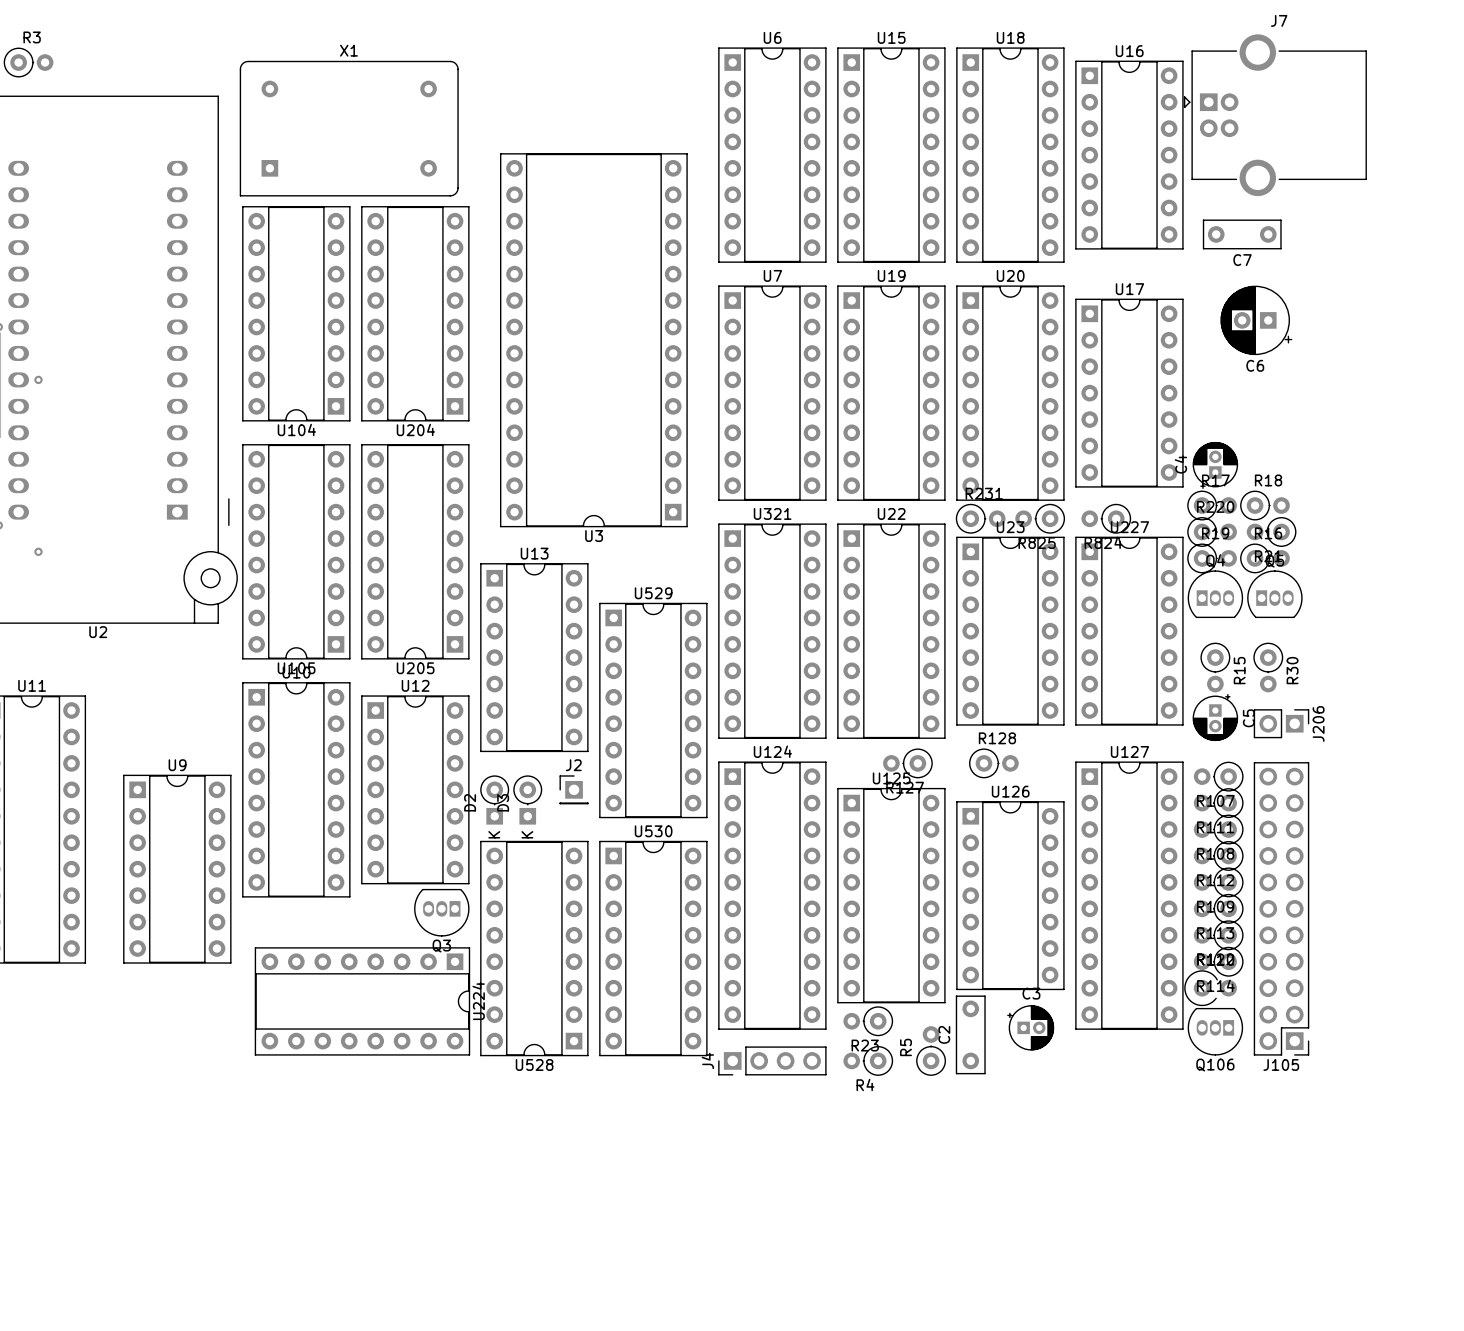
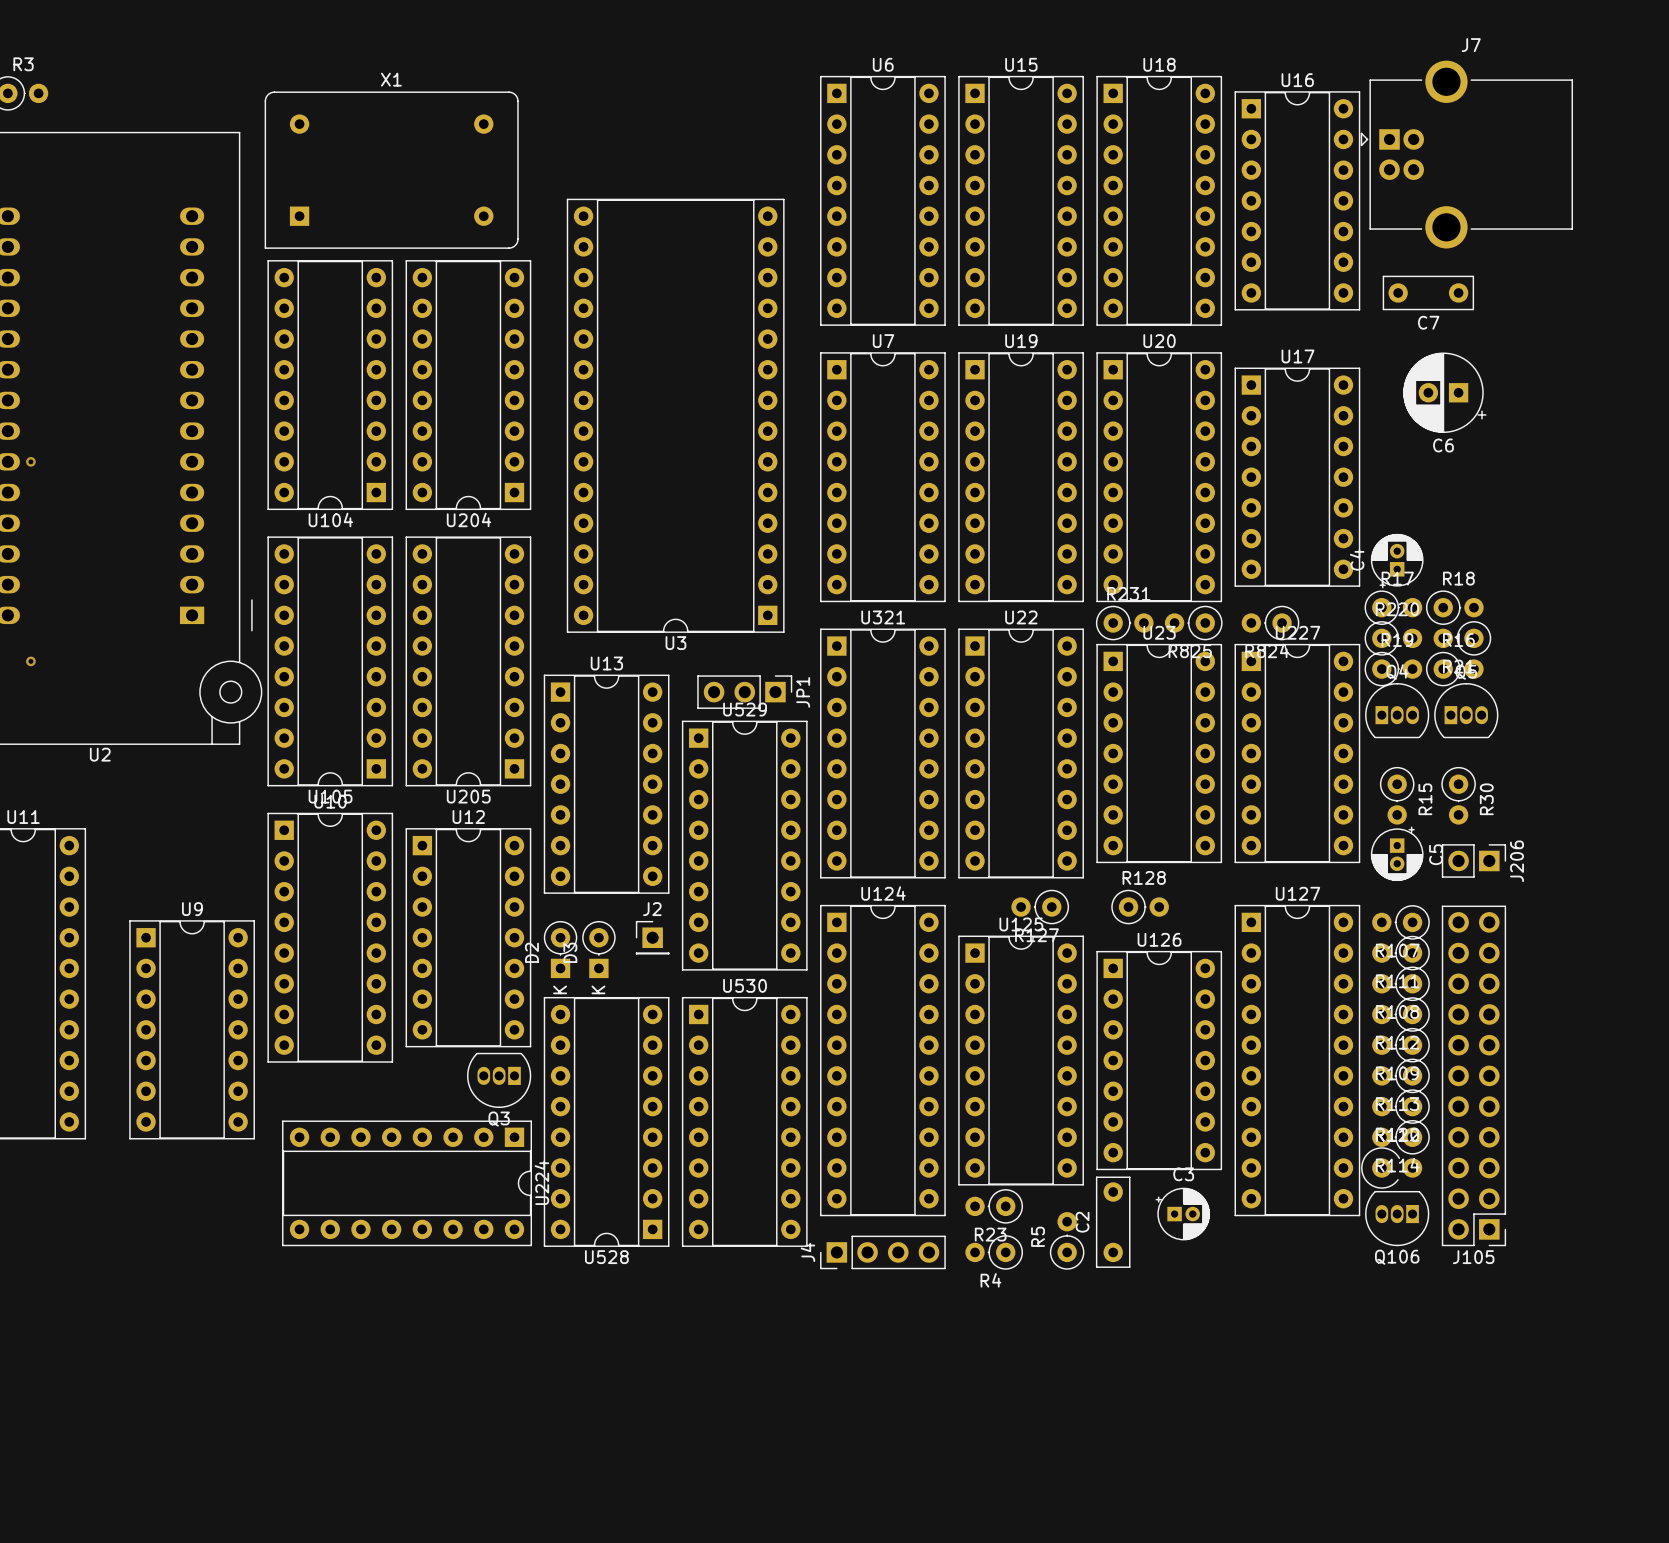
JP1: none -> (744, 692)

